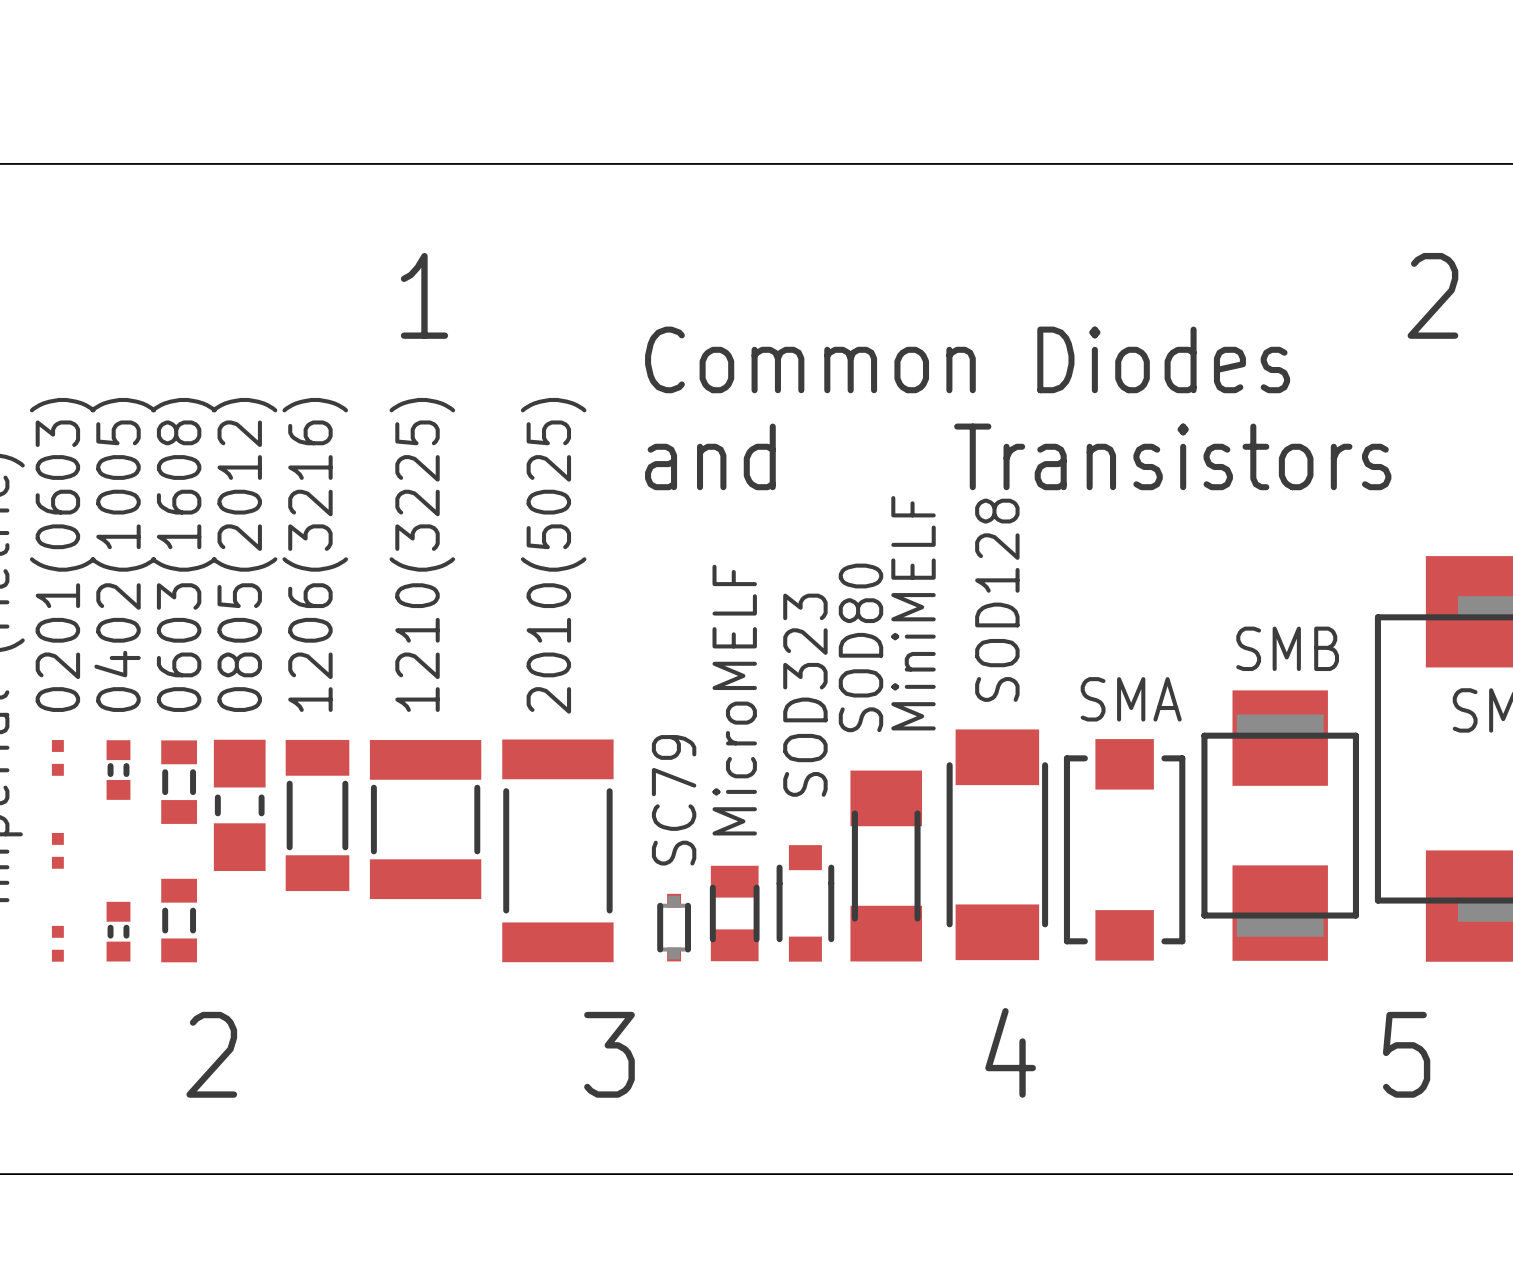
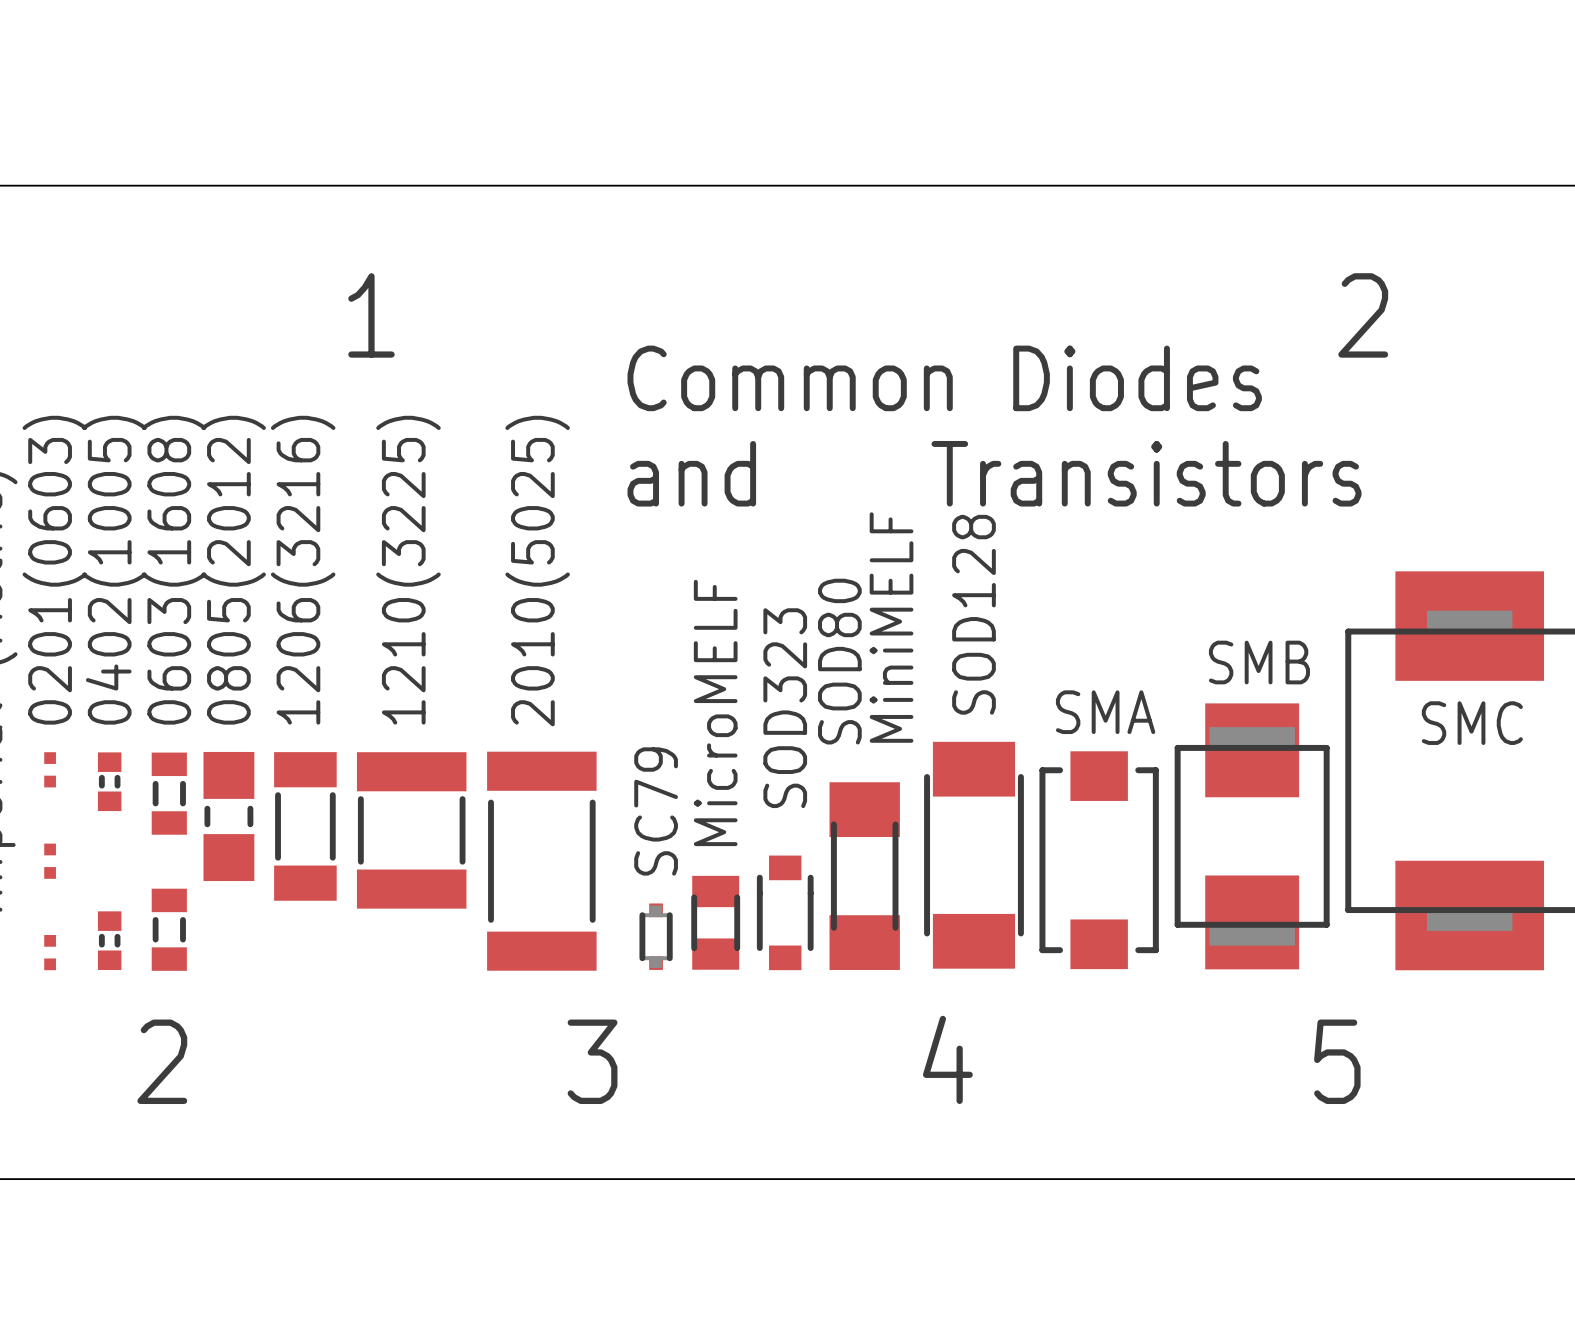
text position: 1 (424, 295) -> 1 (371, 315)
text position: 2 (1432, 295) -> 2 (1363, 315)
text position: 4 (1010, 1052) -> 4 (947, 1059)
text position: 2 (211, 1054) -> 2 (162, 1061)
text position: 5 (1406, 1054) -> 5 (1337, 1061)

